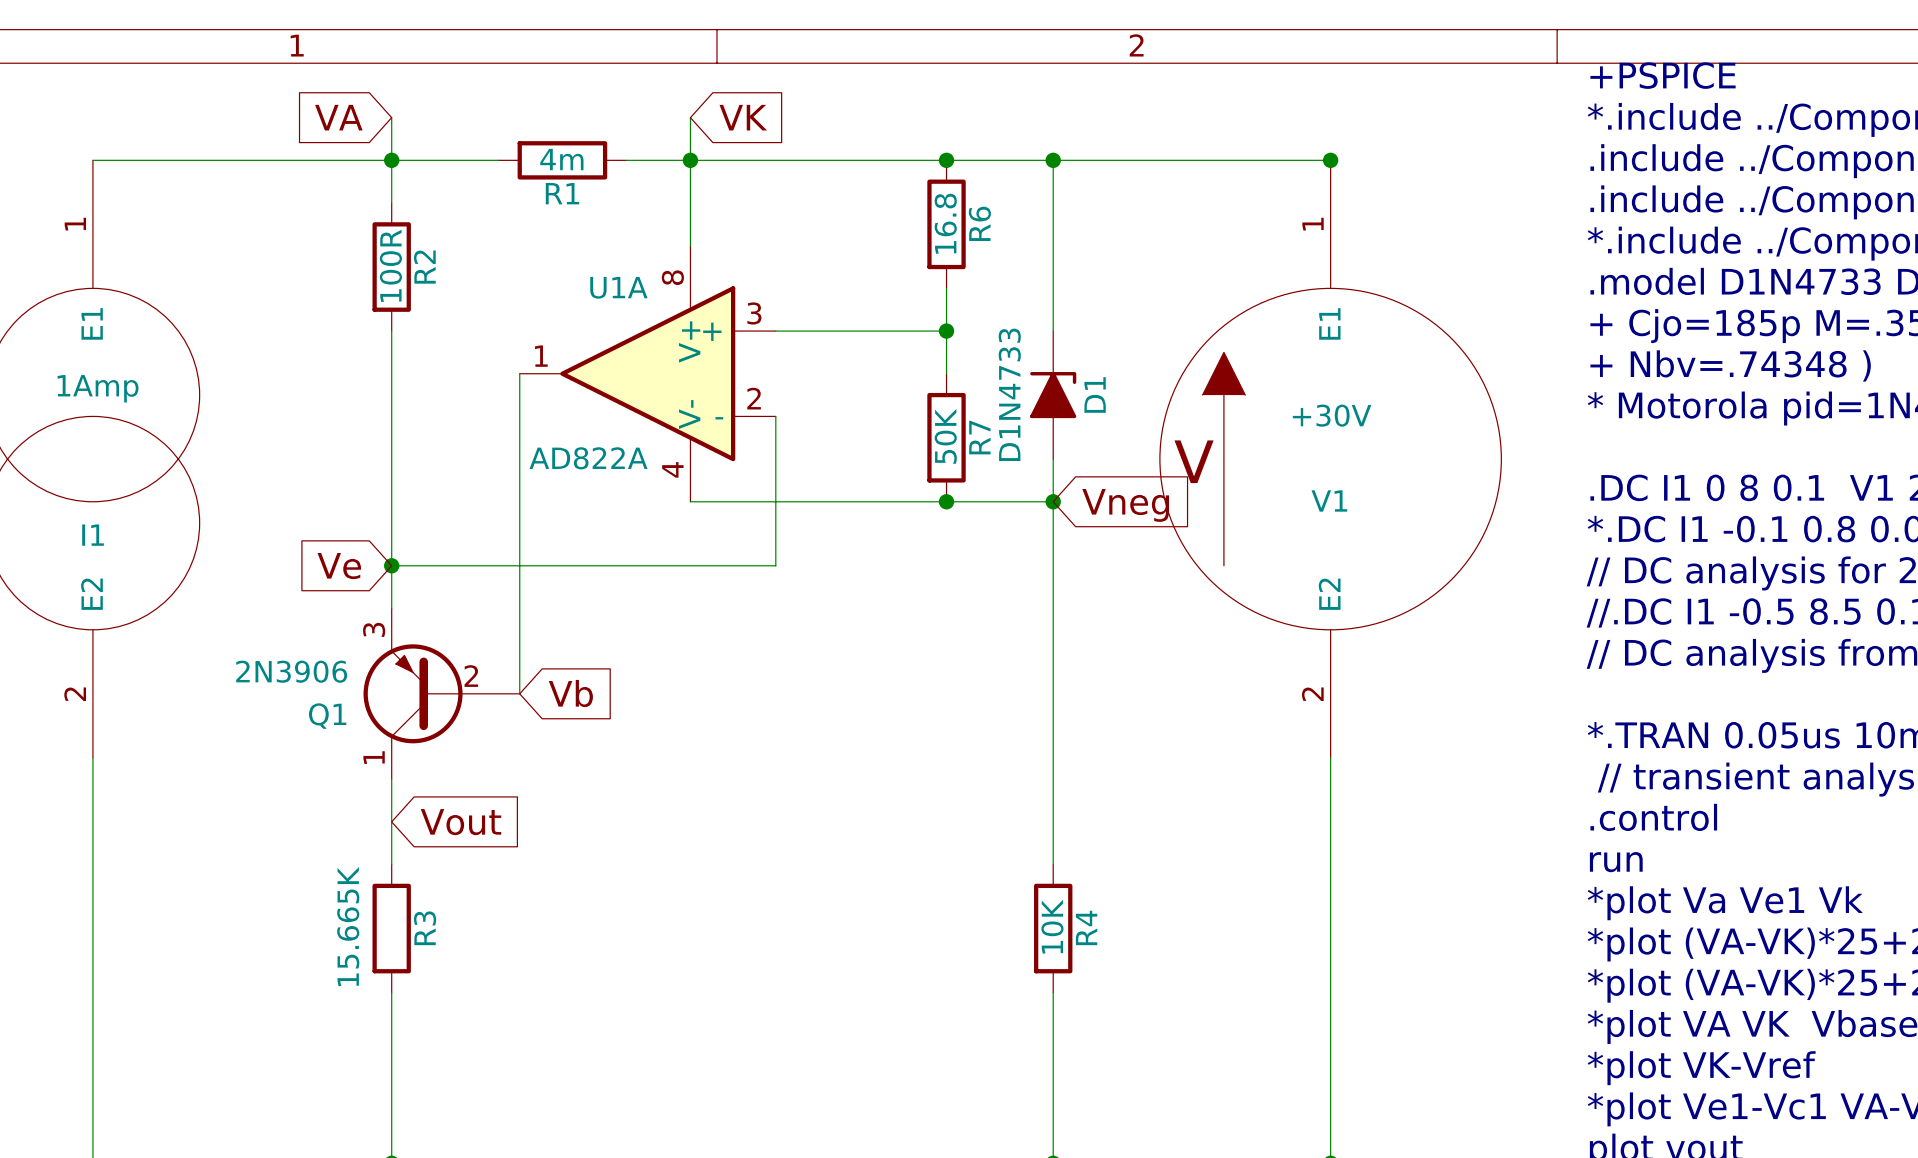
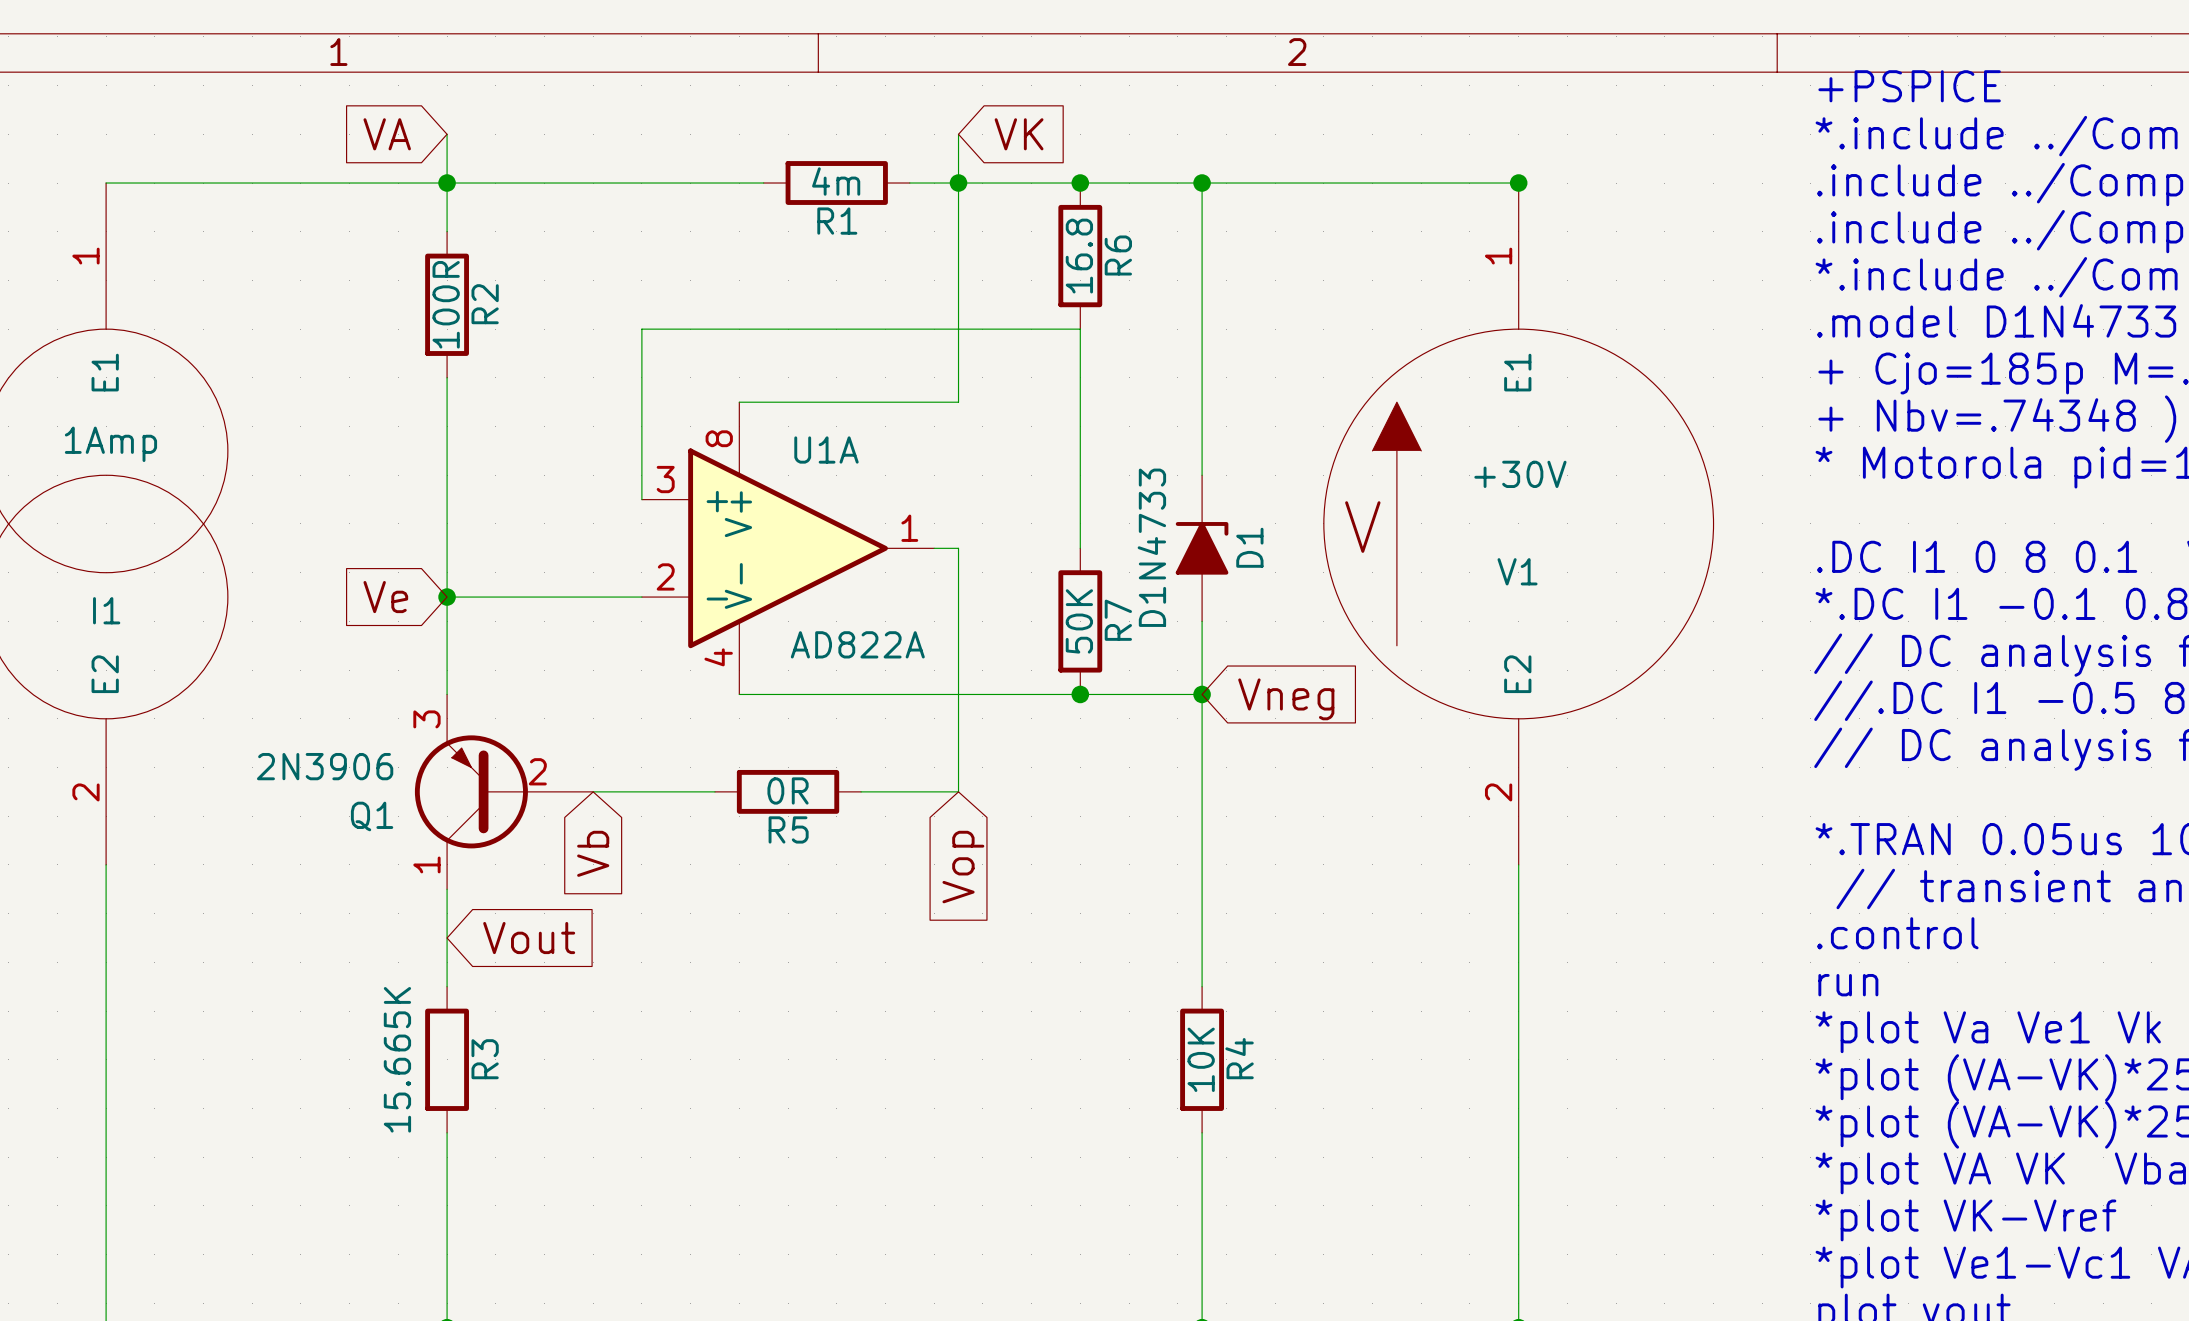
wire: (690, 117) (690, 245) -> none
global label position: VK (743, 117) -> VK (1019, 134)
wire: none -> (958, 134) (958, 402) (739, 402)
R1 position: (562, 160) -> (836, 183)
wire: (669, 160) (797, 160) -> (568, 183) (714, 183)
junction: (690, 160) -> none
junction: none -> (958, 183)
wire: none -> (1080, 329) (641, 329) (641, 499)
wire: (775, 331) (946, 331) -> none
junction: (946, 331) -> none
wire: (519, 373) (519, 693) -> (714, 791) (593, 791)
U1A flip: as is (647, 373) -> left-right (788, 548)
wire: none -> (1080, 426) (1080, 548)
D1 position: (1053, 395) -> (1202, 548)
wire: (775, 416) (775, 565) (391, 565) -> none
R7 position: (946, 437) -> (1080, 621)
wire: none -> (934, 548) (958, 548) (958, 791) (861, 791)
wire: (690, 501) (1053, 501) -> none
junction: (946, 501) -> none
junction: (1053, 501) -> none
global label position: Vneg (1125, 505) -> Vneg (1286, 699)
wire: none -> (447, 597) (641, 597)
junction position: (391, 565) -> (447, 597)
global label position: Ve (339, 566) -> Ve (385, 597)
wire: none -> (739, 694) (1202, 694)
junction: none -> (1080, 694)
junction: none -> (1202, 694)
global label rotation: 0° (570, 693) -> 90° clockwise (593, 853)
R5: none -> 0R (788, 791)
global label: none -> Vop (963, 867)

